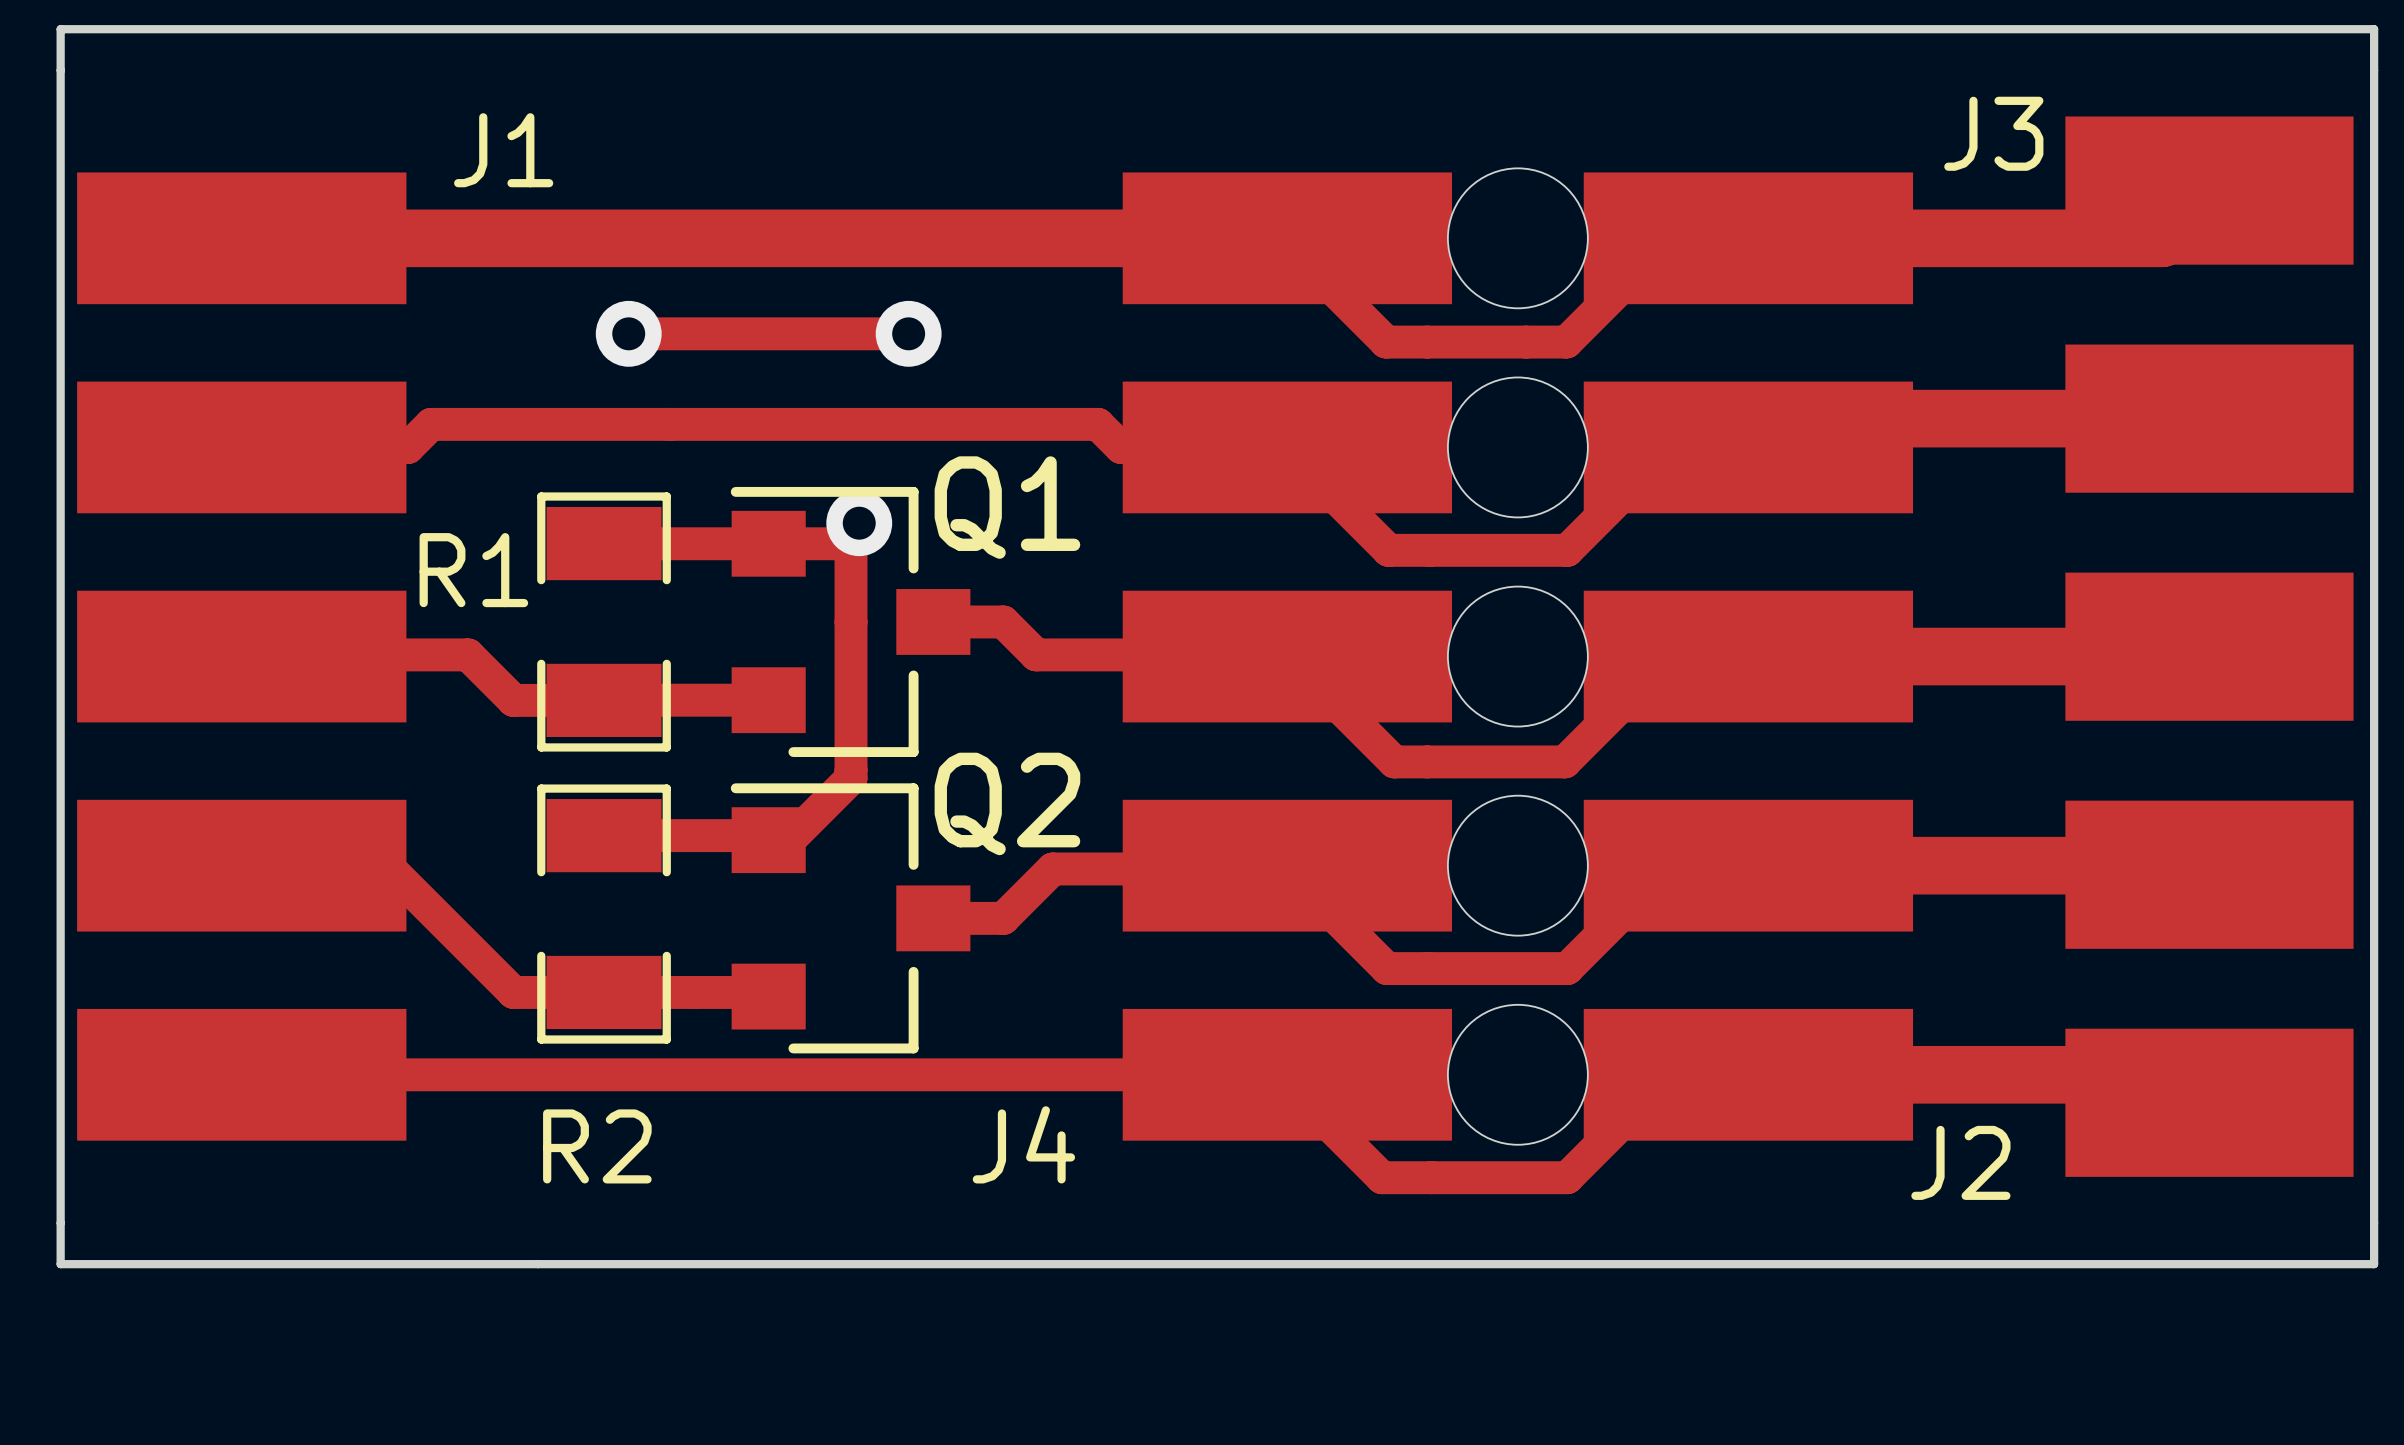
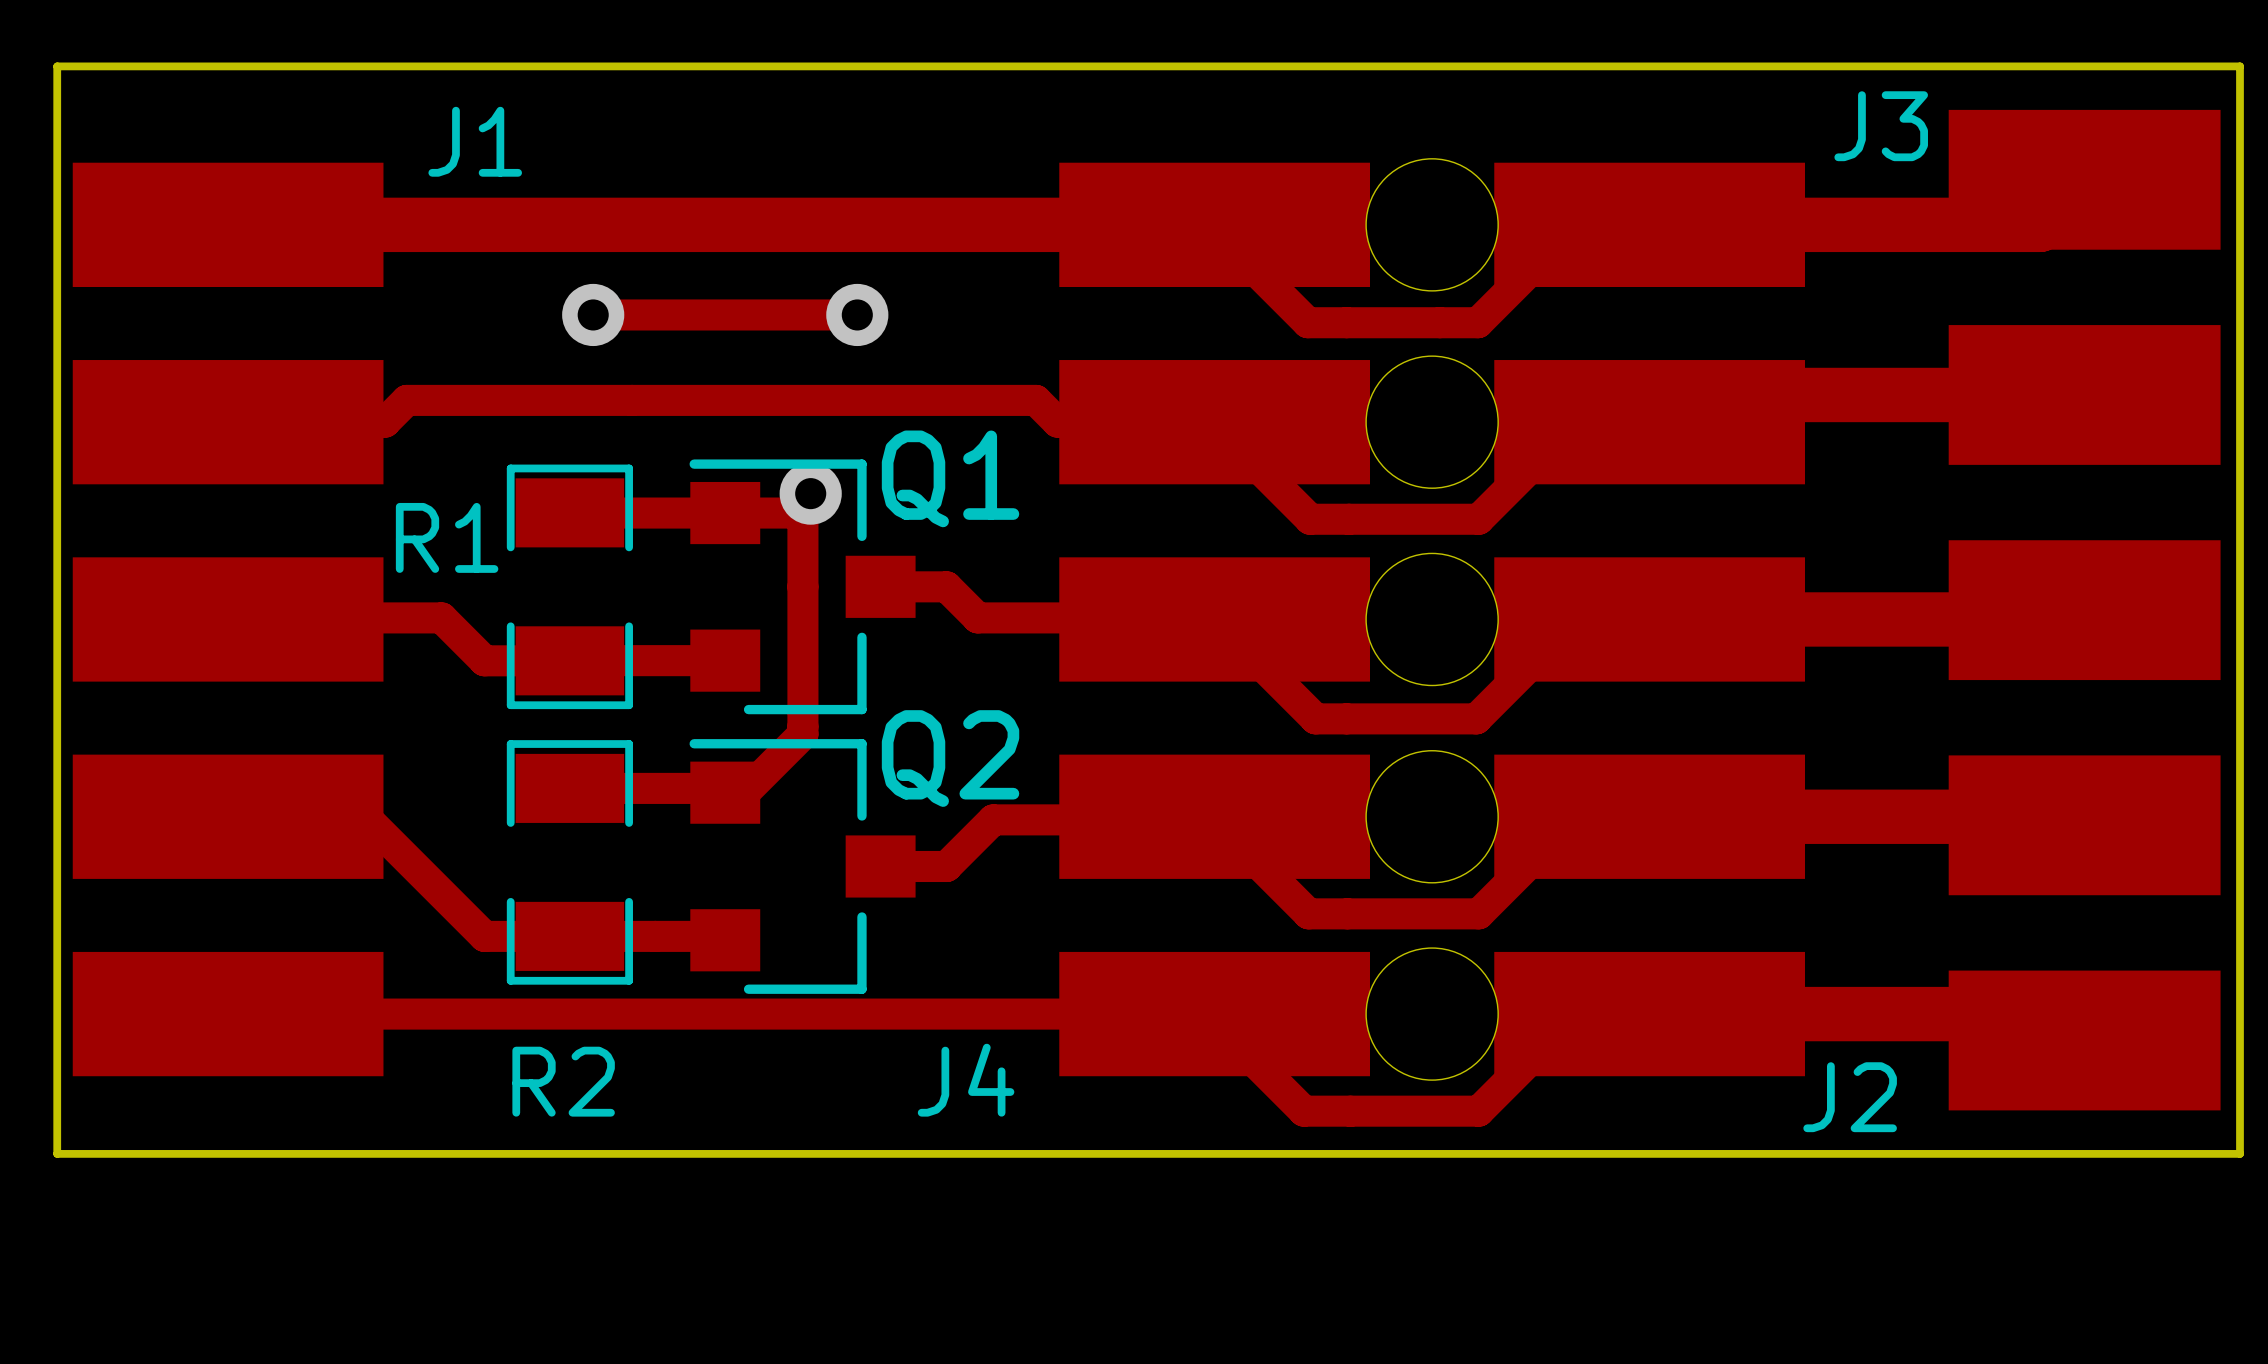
board edge: (60, 70) (60, 29) (2374, 29) (2374, 70) -> (57, 66) (2239, 66)
board edge: (60, 1222) (60, 1264) (2374, 1264) (2374, 1222) -> (57, 1153) (2239, 1153)

